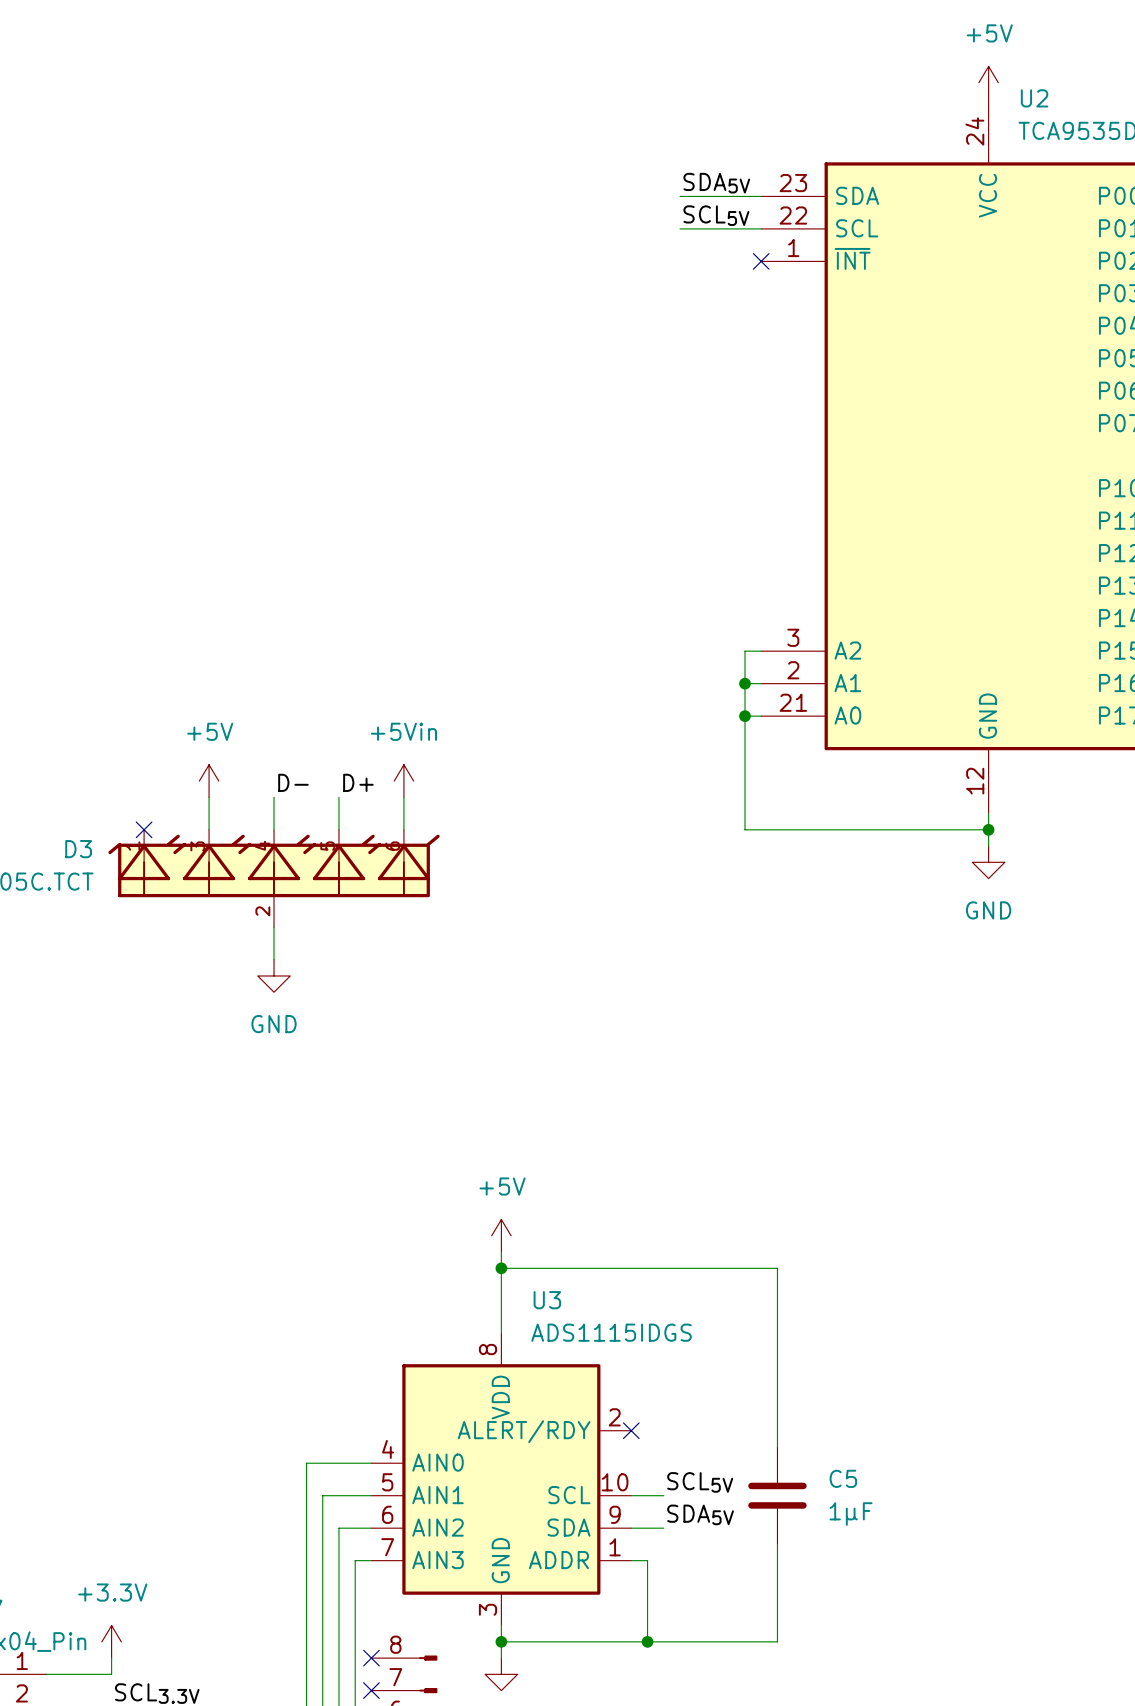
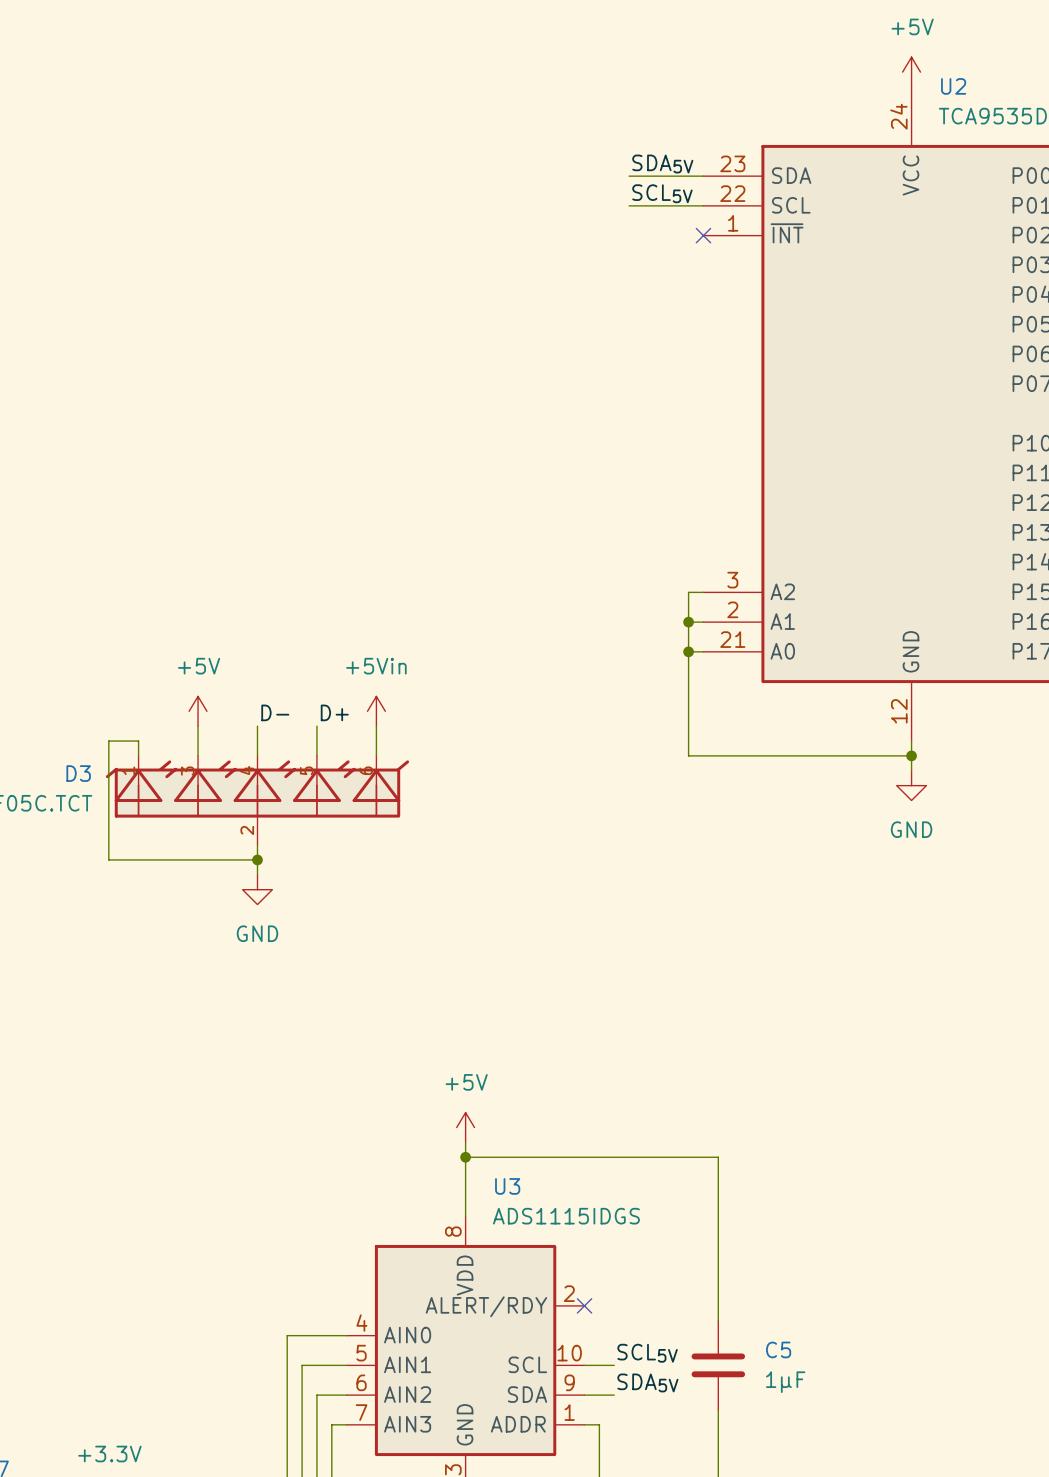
wire: none -> (138, 755) (138, 741) (108, 741) (108, 859) (257, 859)
no-connect mark: (144, 829) -> none
junction: none -> (257, 859)

